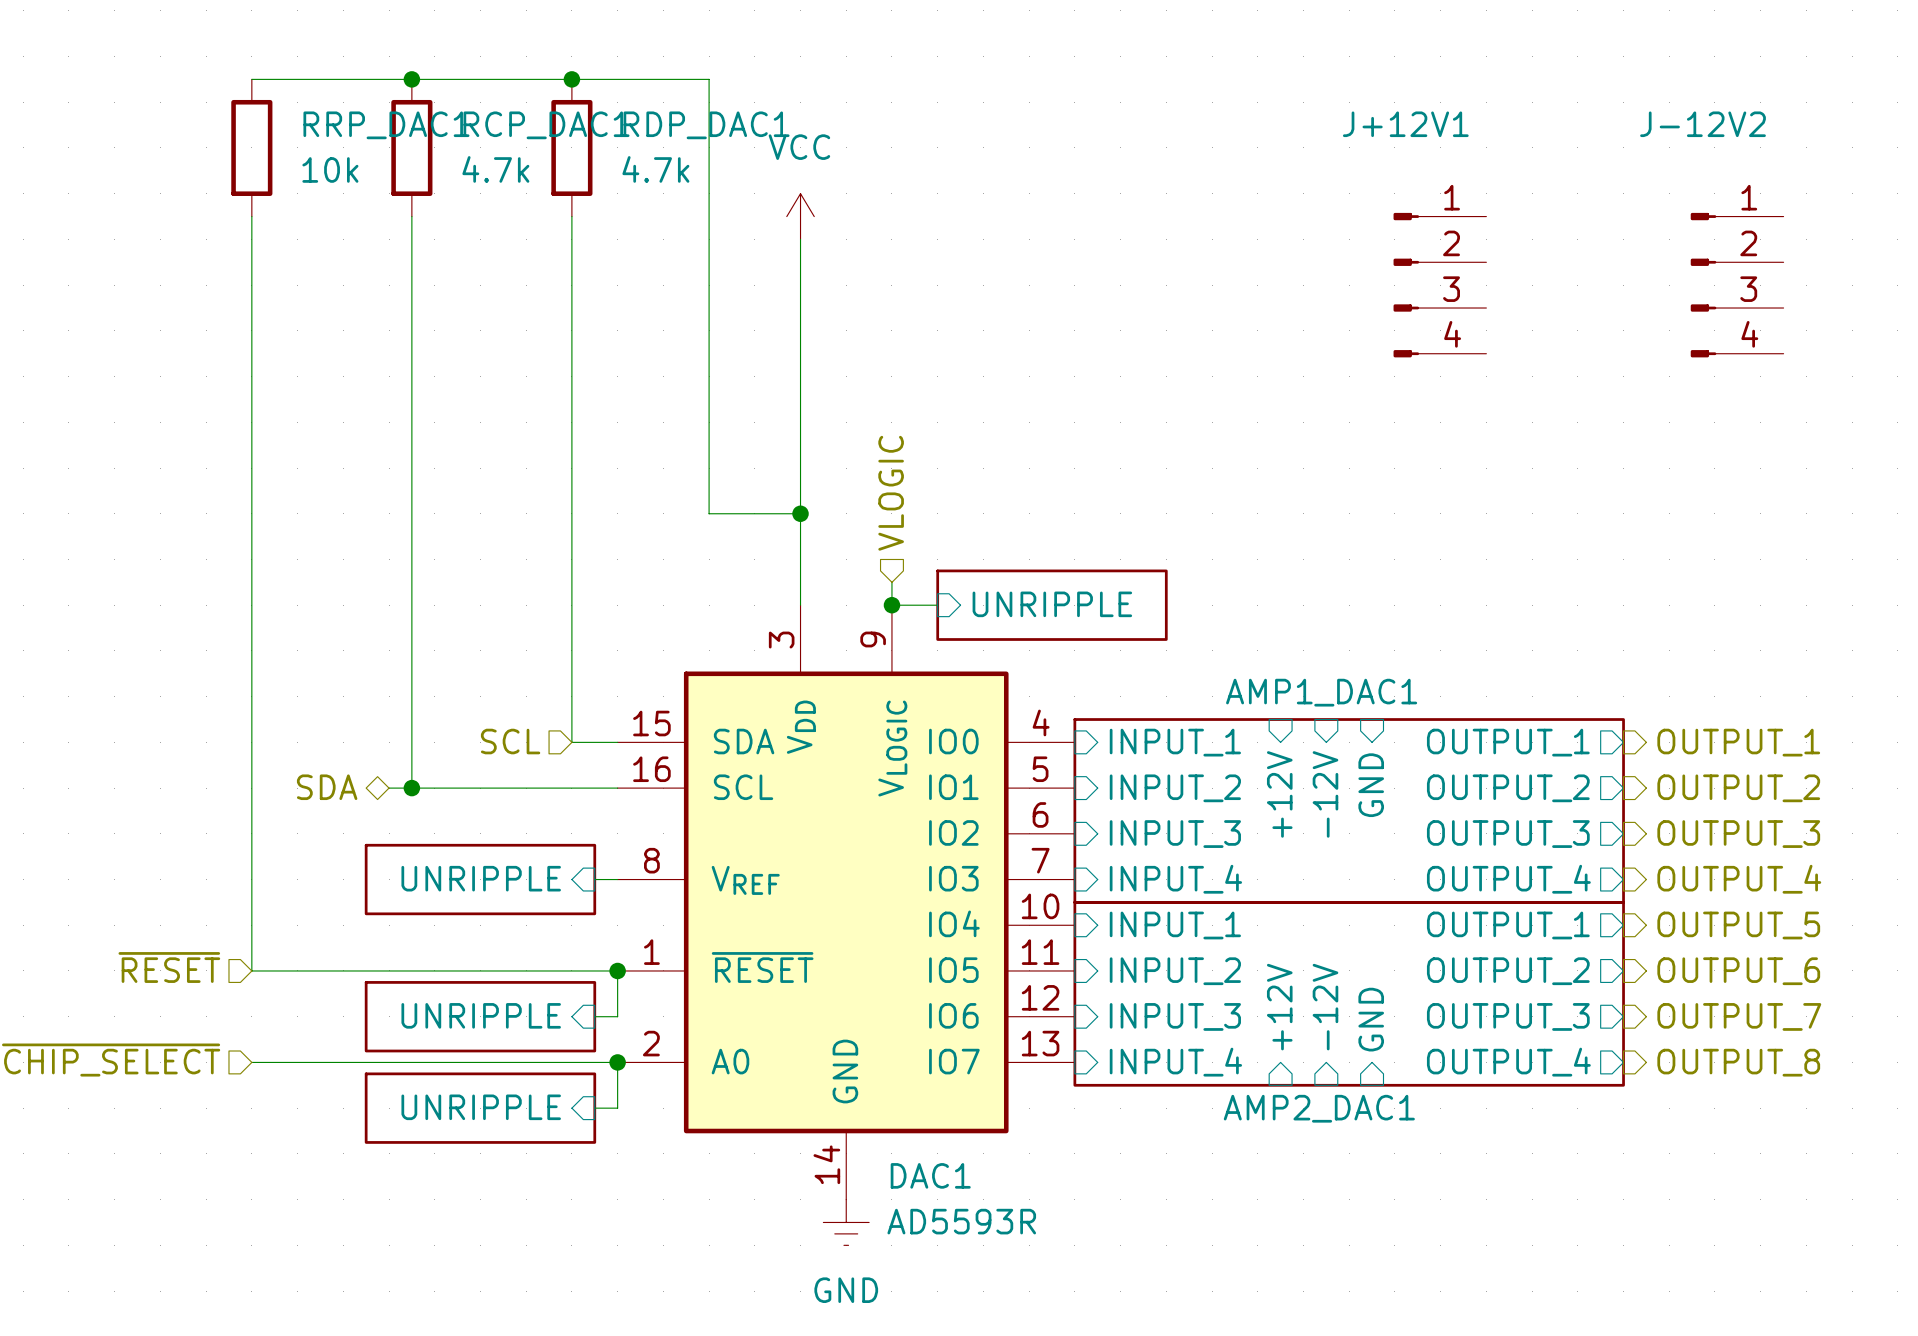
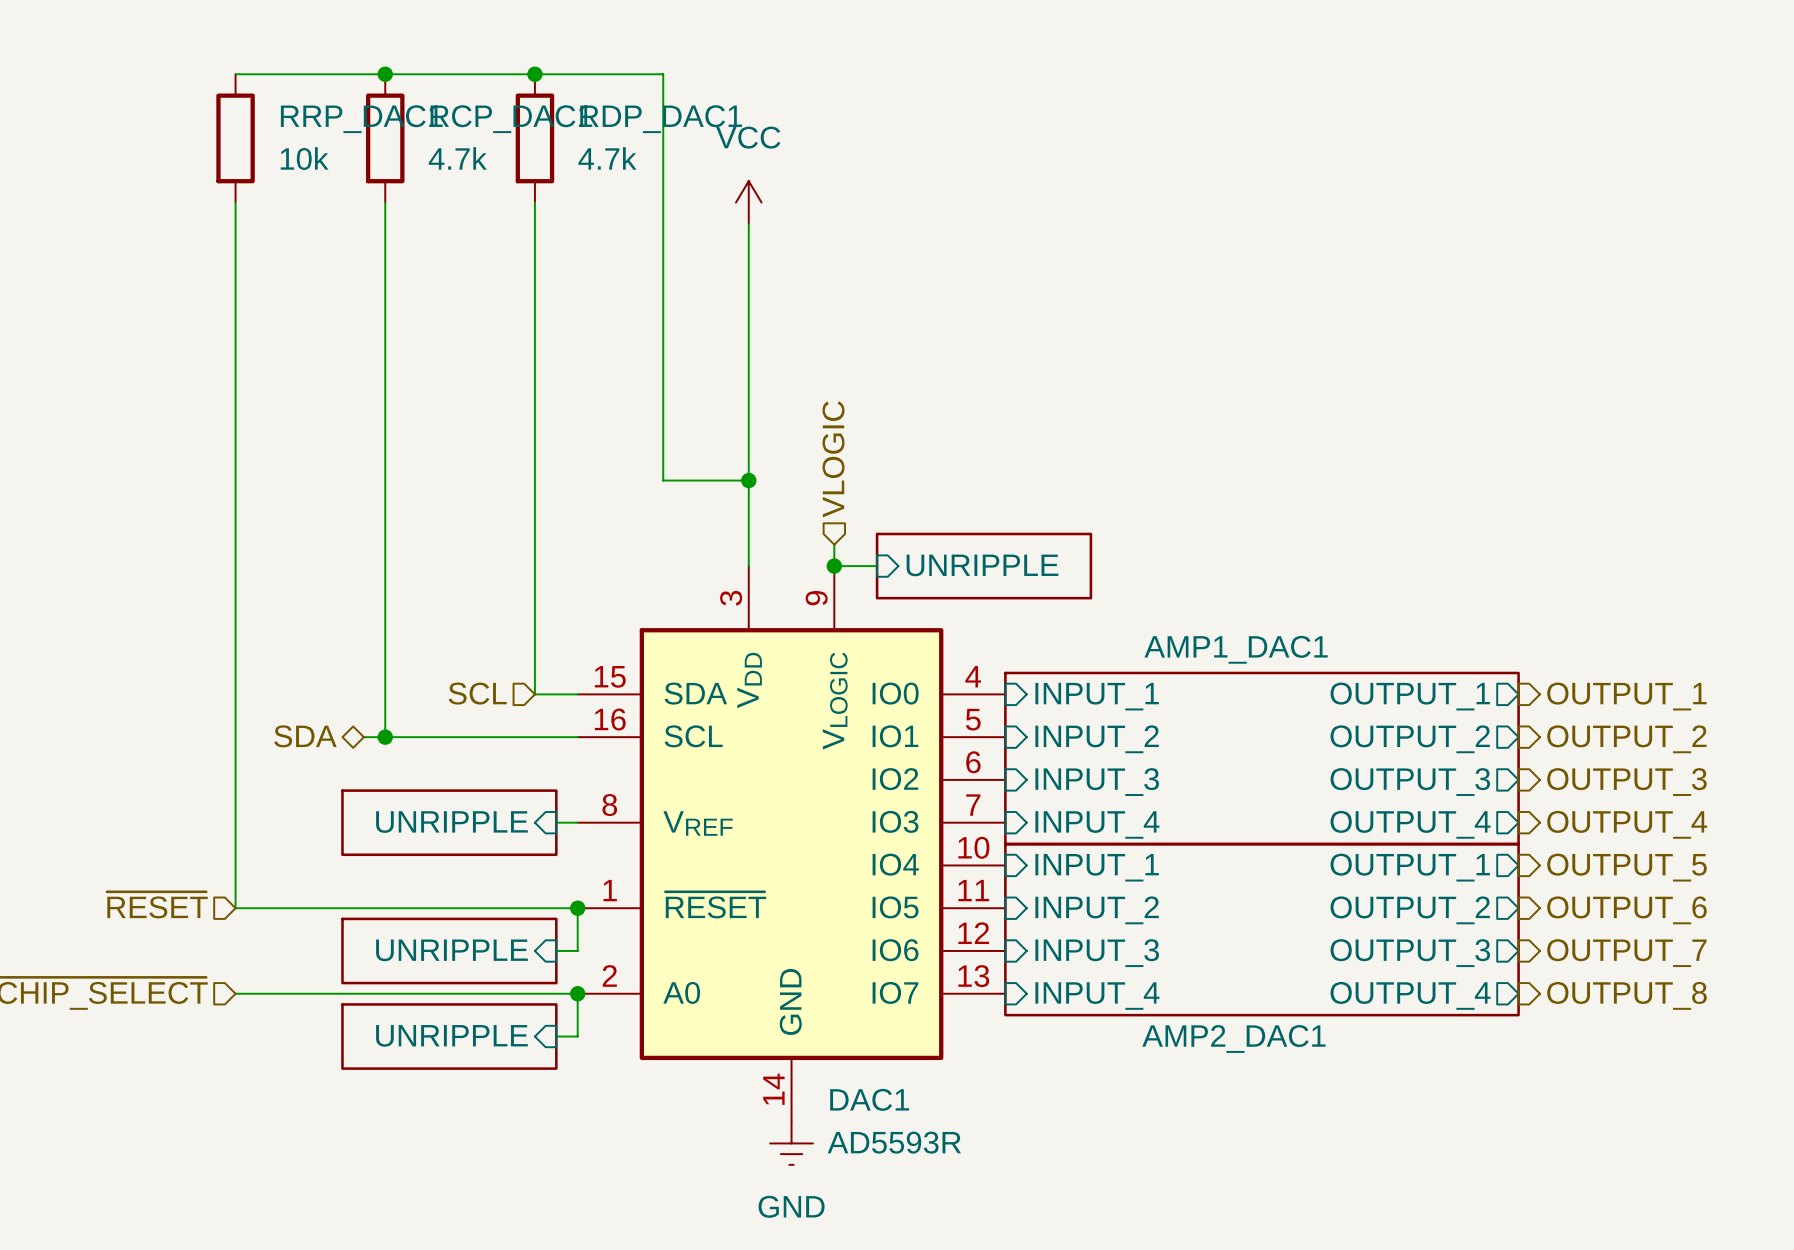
J+12V1: (1439, 285) -> none
J-12V2: (1737, 285) -> none
sheet pin: GND (1371, 785) -> none
sheet pin: +12V (1279, 794) -> none
sheet pin: -12V (1325, 794) -> none
sheet pin: +12V (1279, 1007) -> none
sheet pin: -12V (1325, 1007) -> none
sheet pin: GND (1371, 1019) -> none

